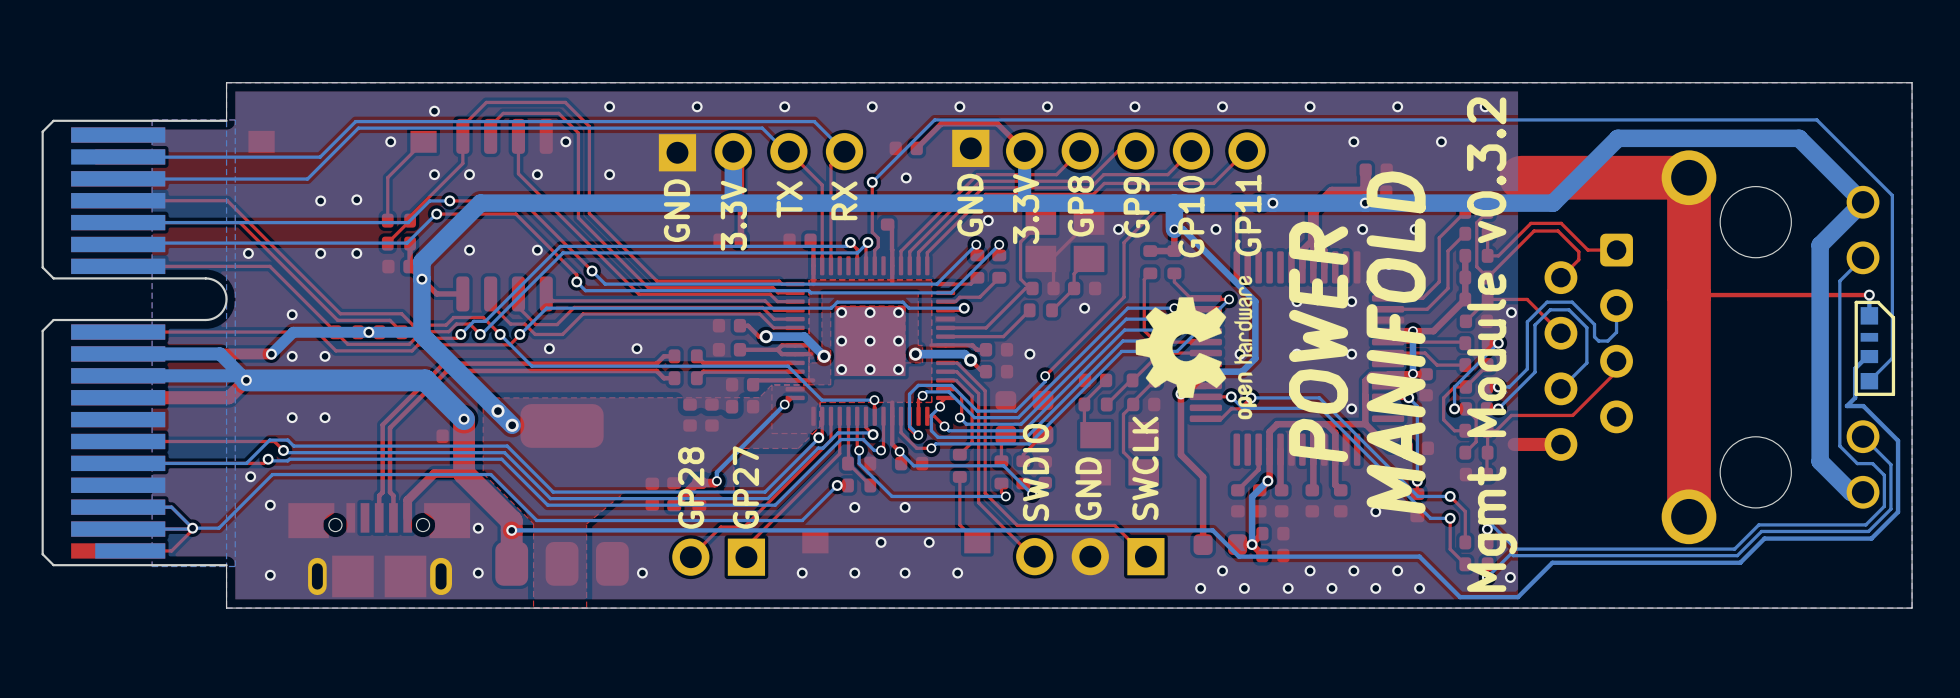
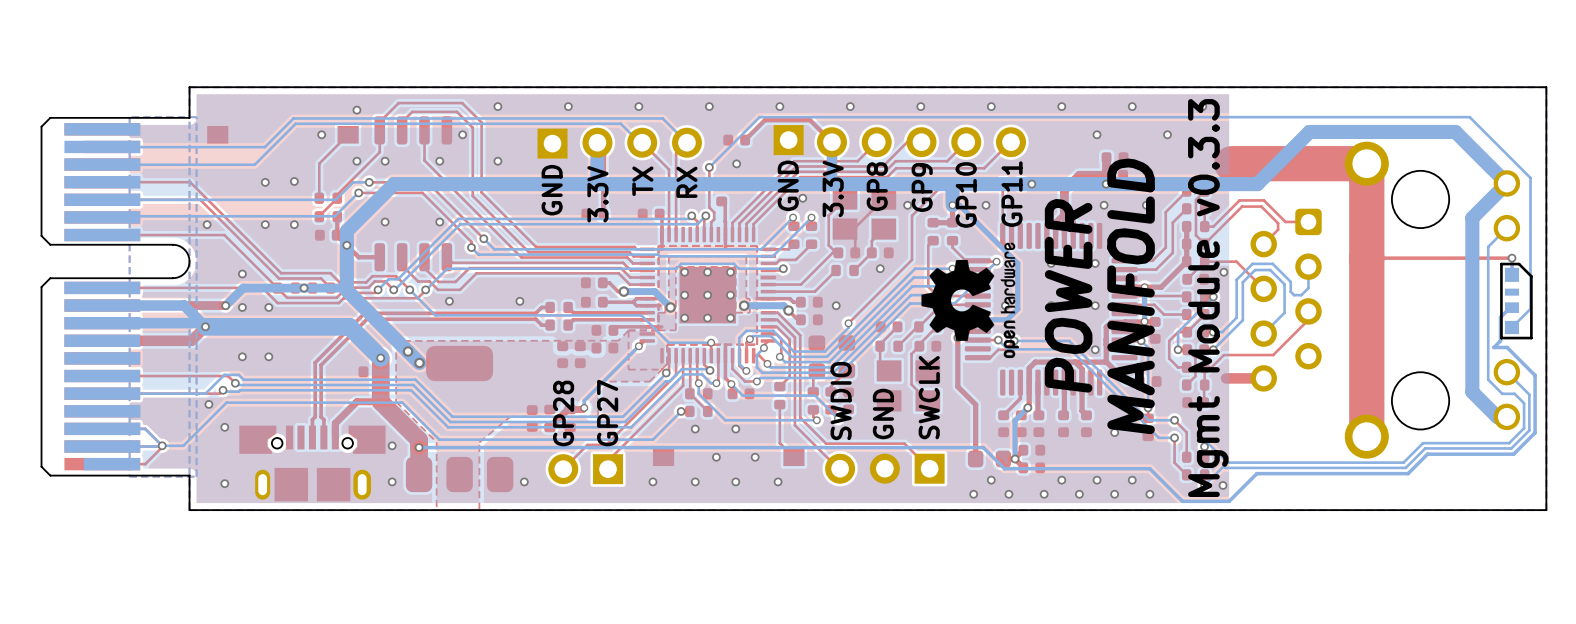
text: Mgmt Module v0.3.2 (1492, 344) -> Mgmt Module v0.3.3 (1208, 298)

